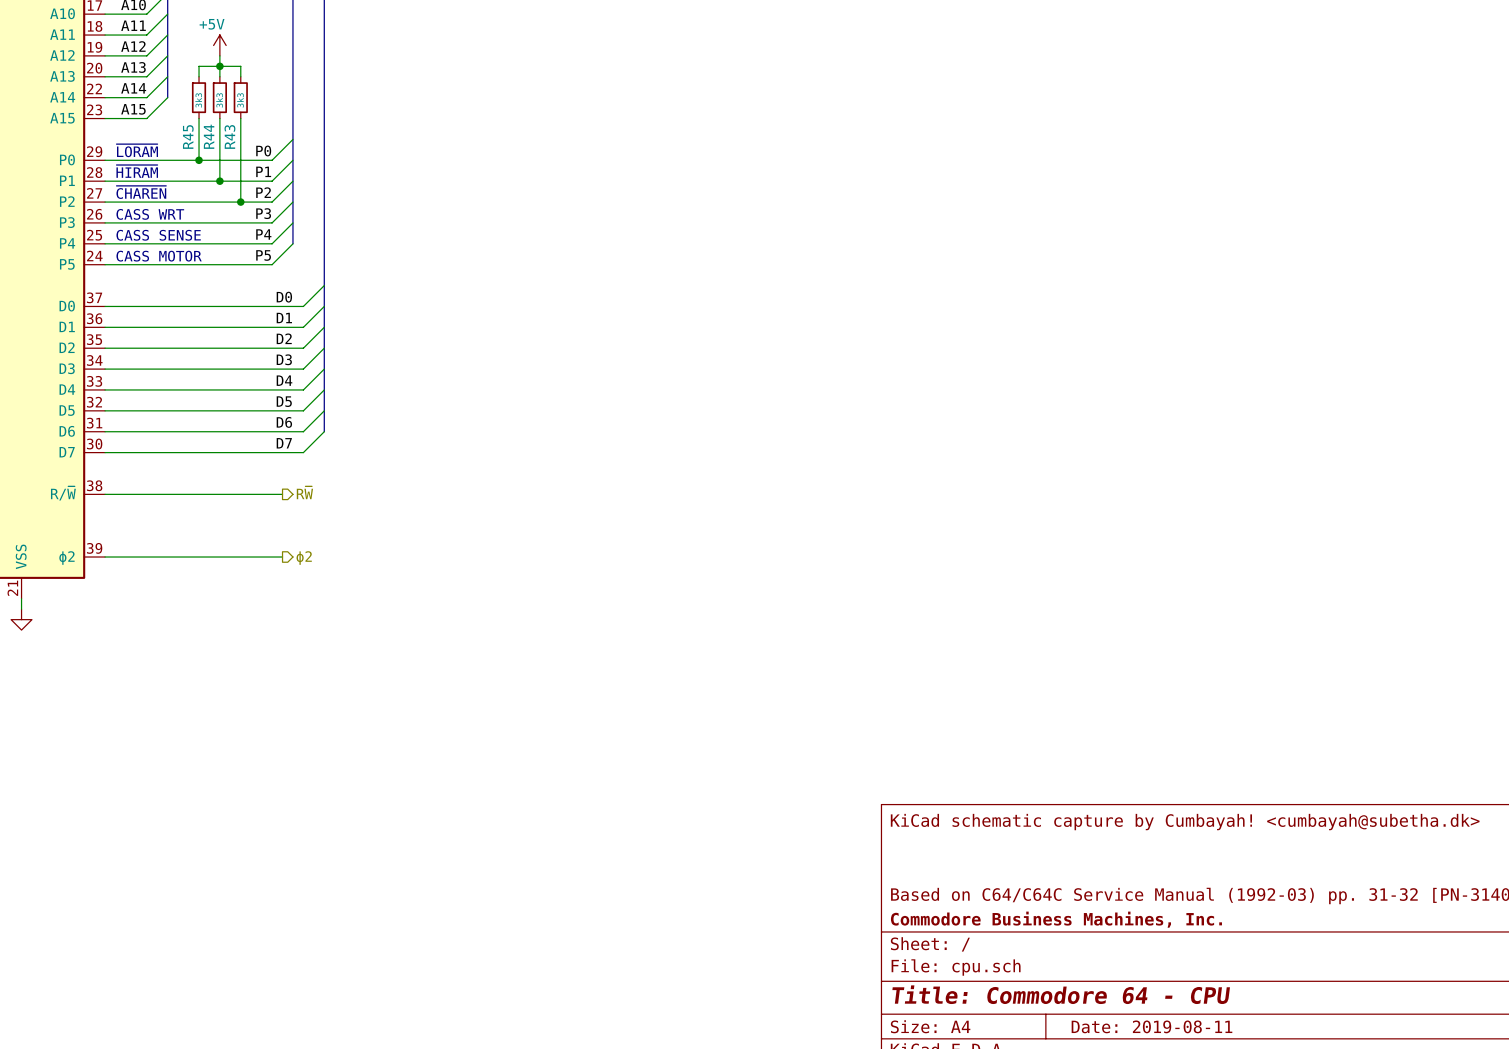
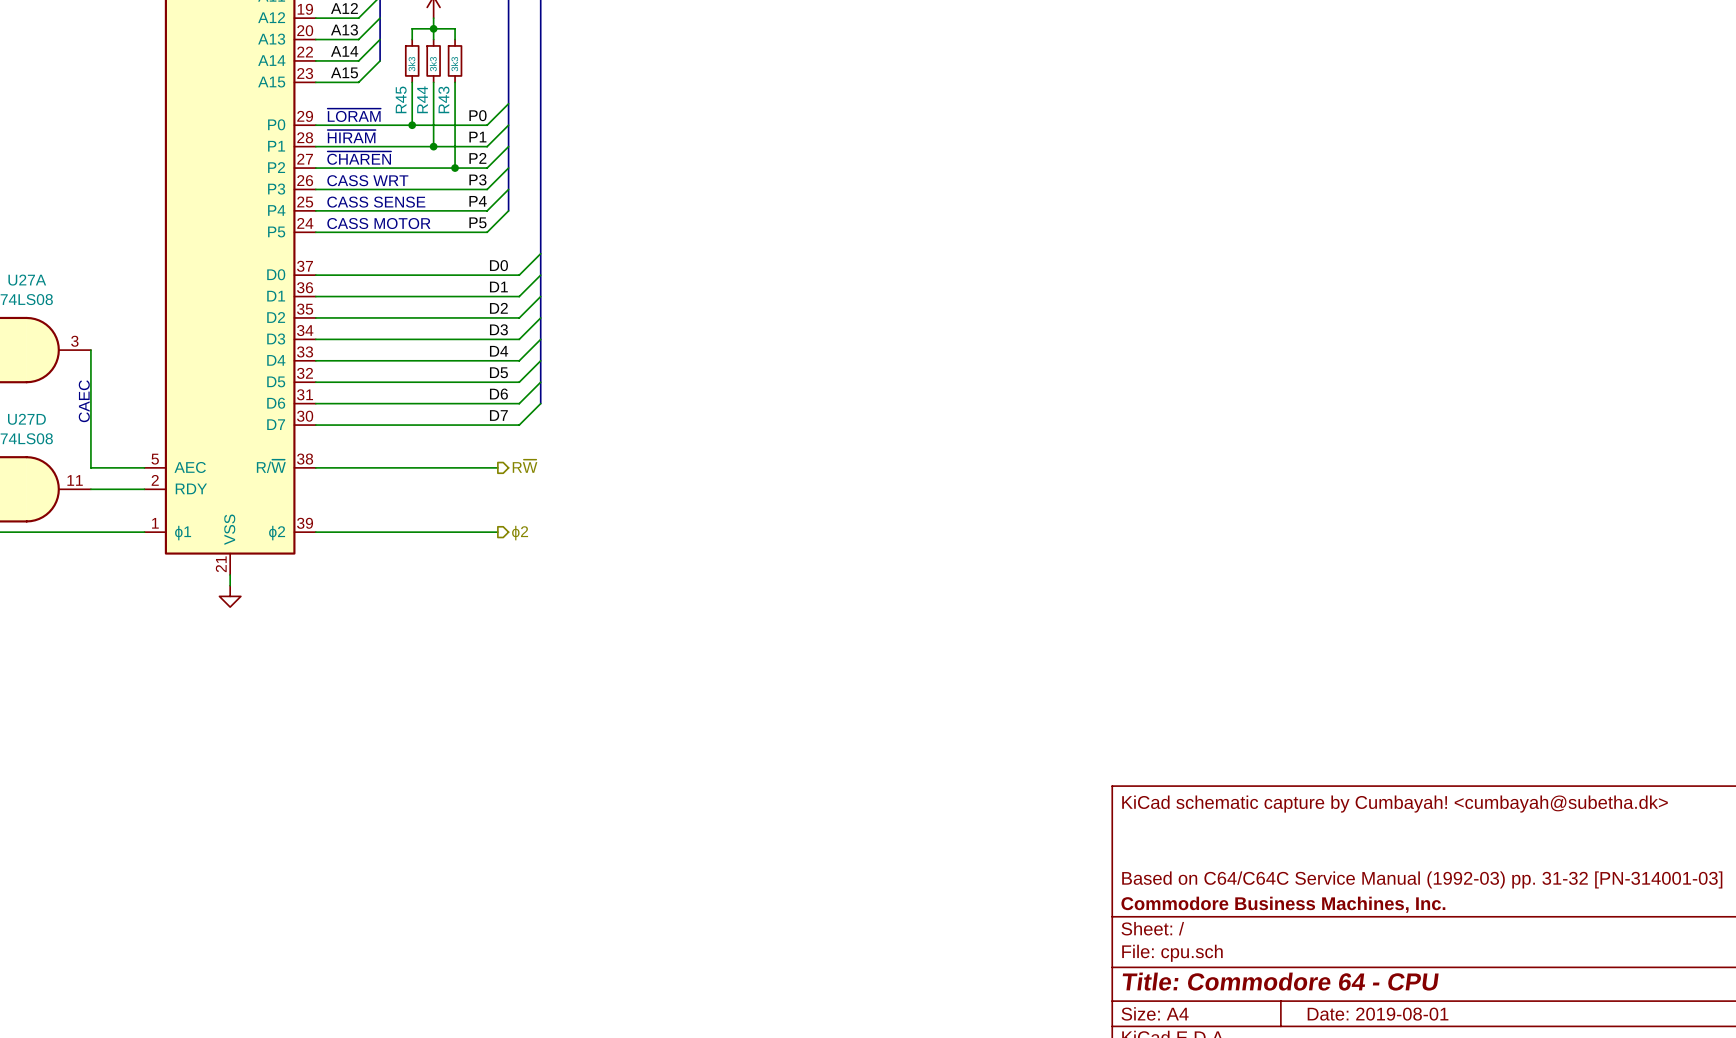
title block: Date: 2019-08-11 (1151, 1026) -> Date: 2019-08-01 (1378, 1014)

